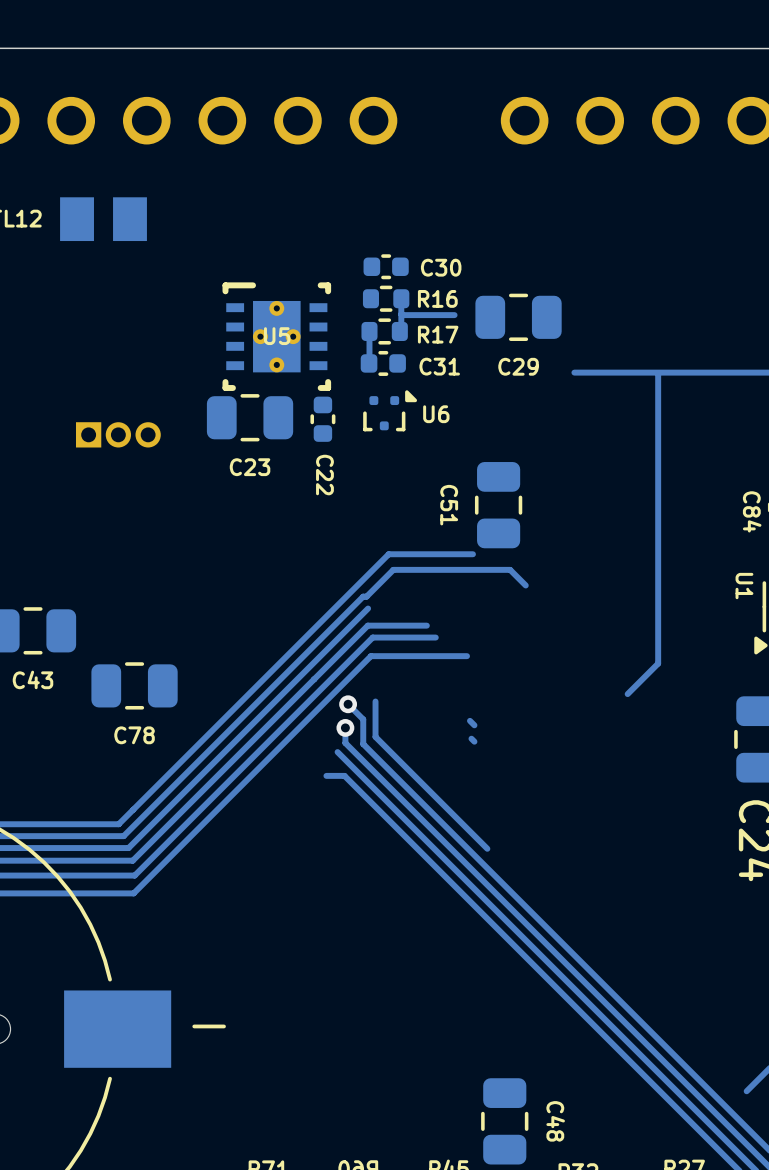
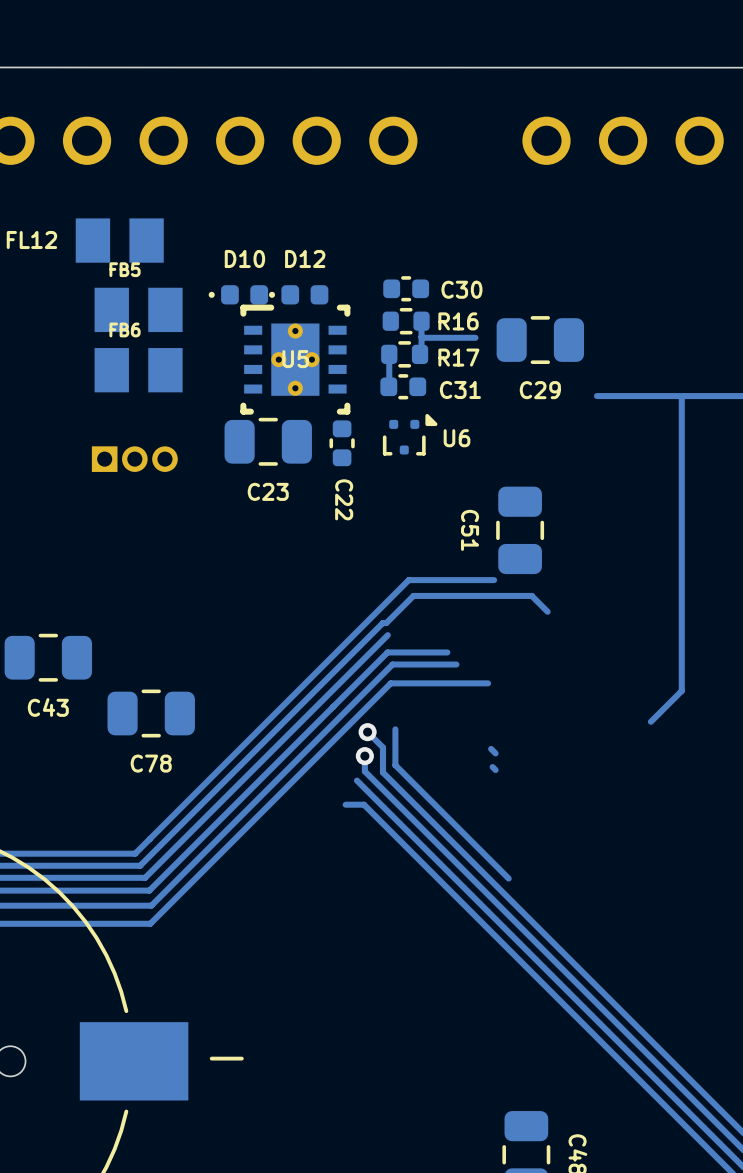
D10: none -> (238, 294)
D12: none -> (298, 294)
FB5: none -> (138, 309)
FB6: none -> (138, 370)

